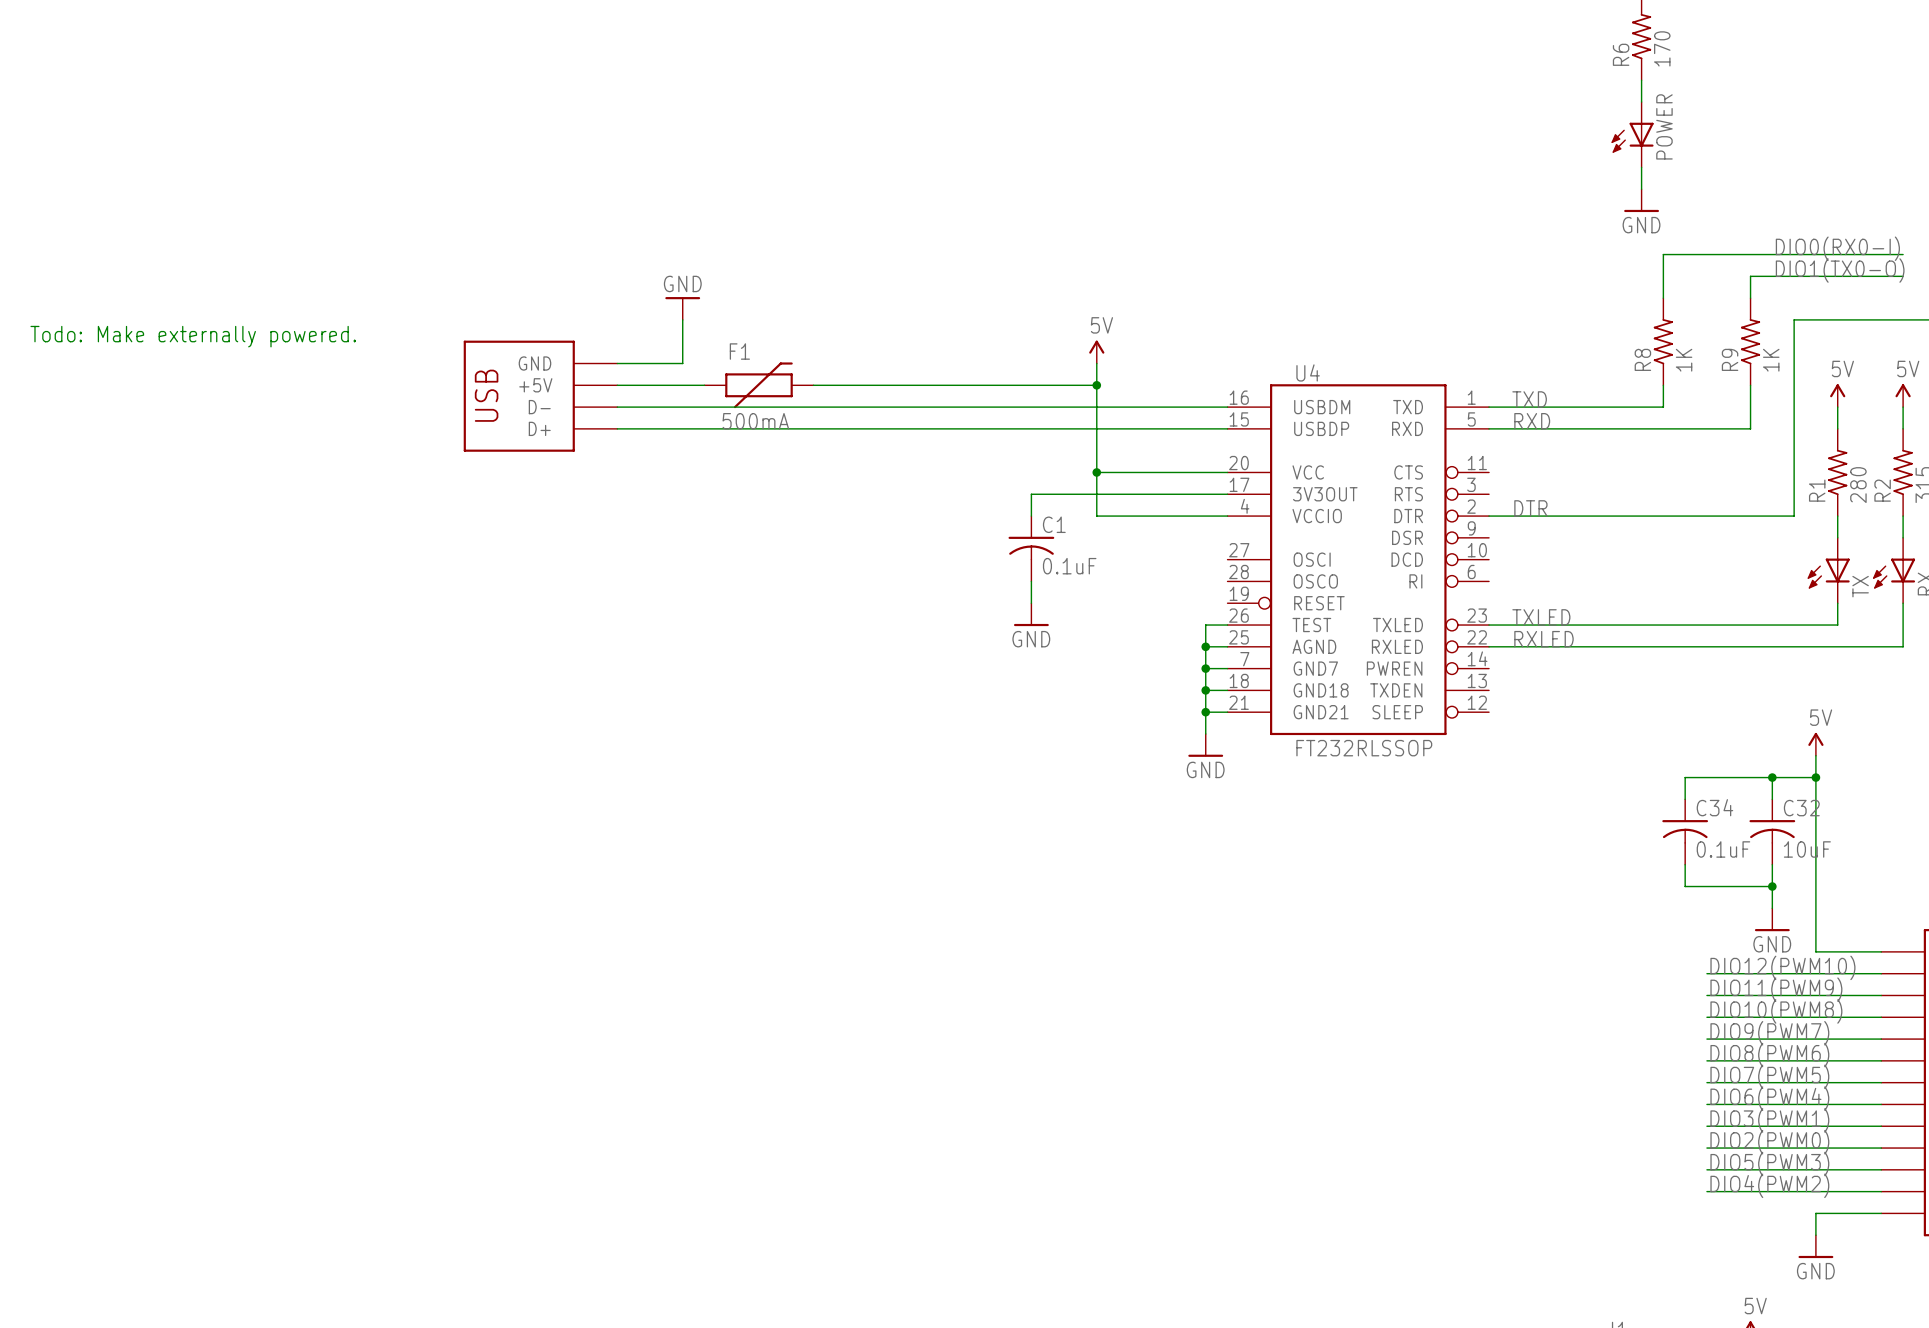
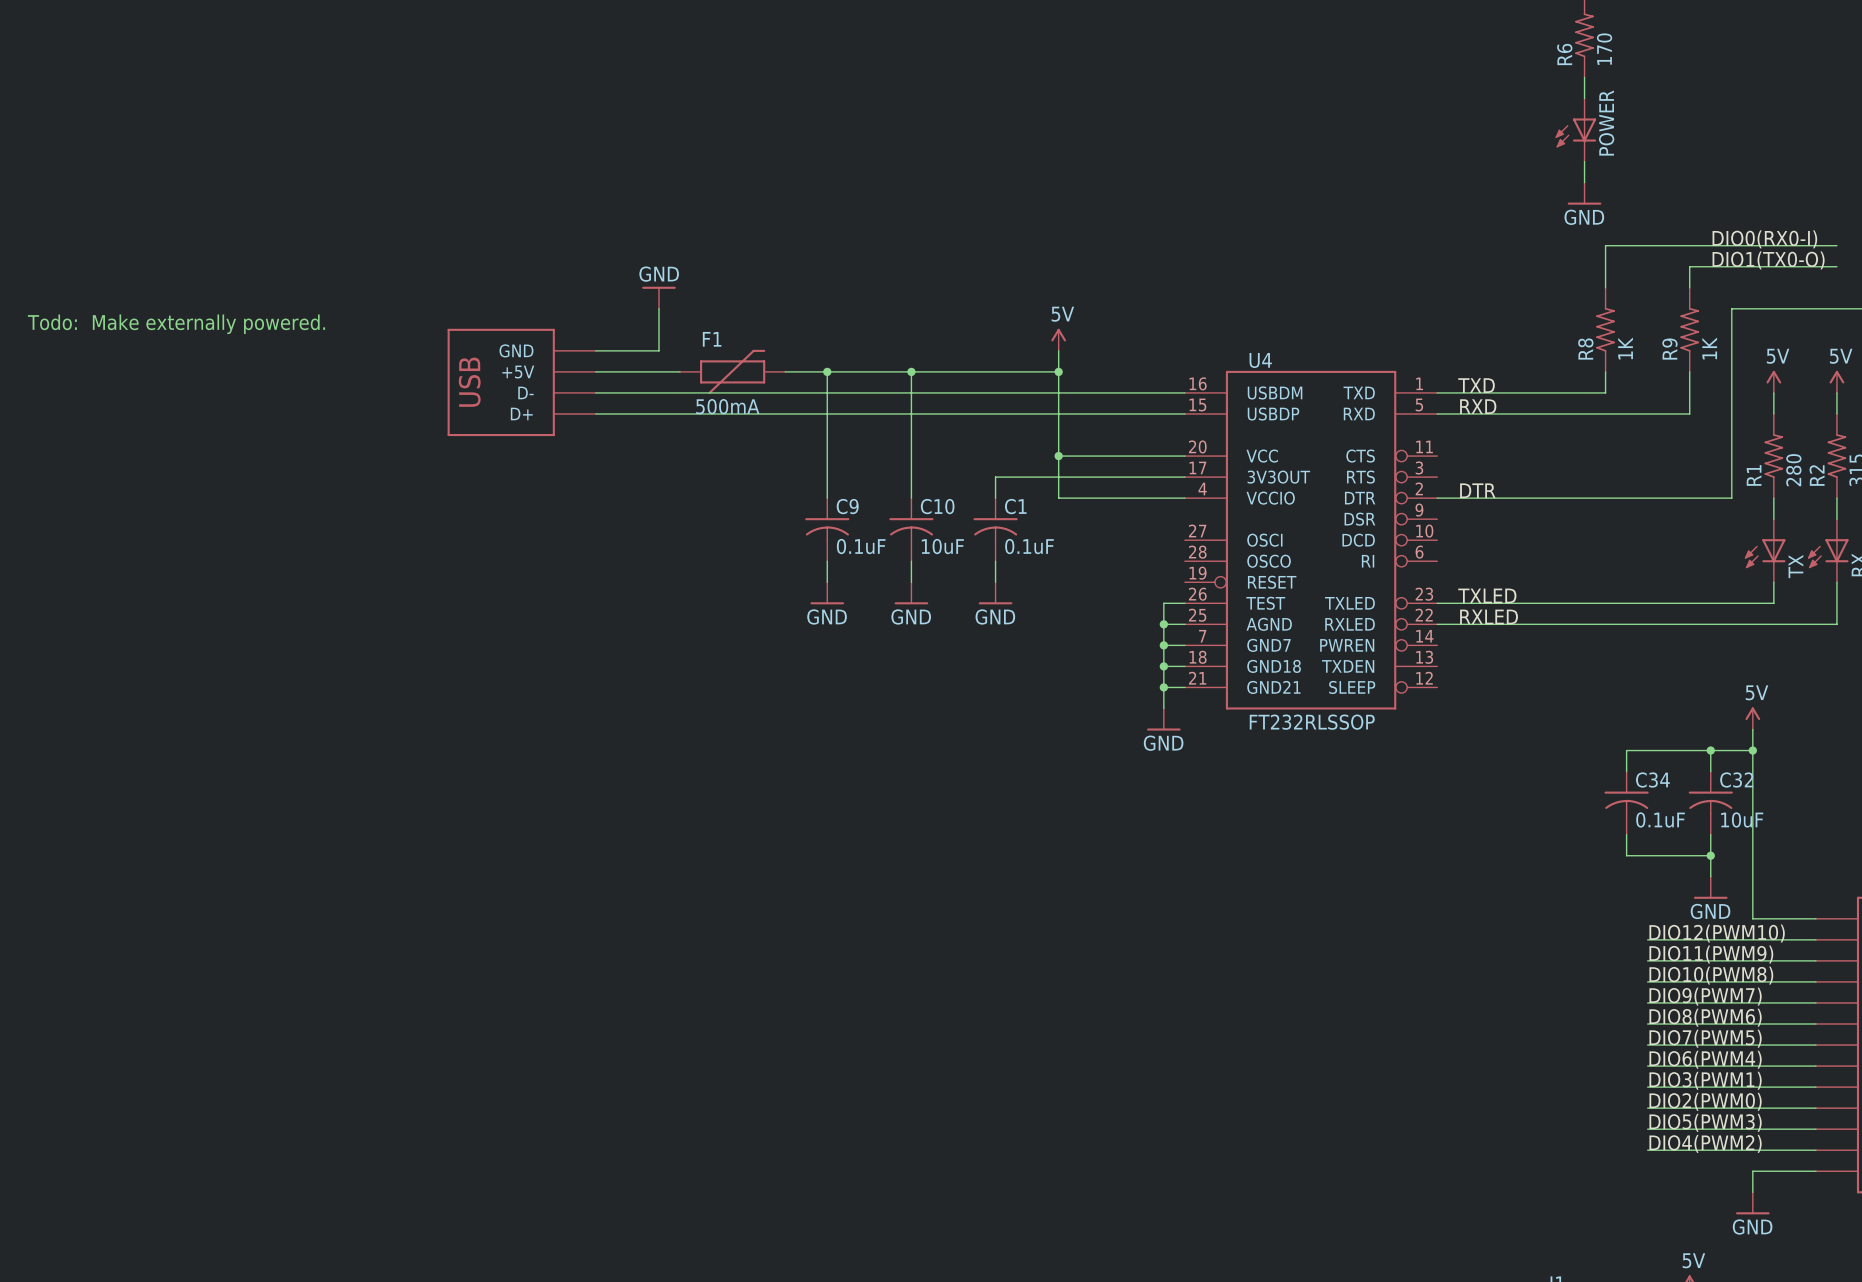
wire: none -> (827, 371) (827, 498)
junction: none -> (827, 371)
wire: none -> (911, 371) (911, 498)
junction: none -> (911, 371)
C9: none -> 0.1uF (827, 529)
C10: none -> 10uF (911, 529)
wire: none -> (827, 561) (827, 582)
wire: none -> (911, 561) (911, 582)
power symbol: none -> GND (827, 593)
power symbol: none -> GND (911, 593)

